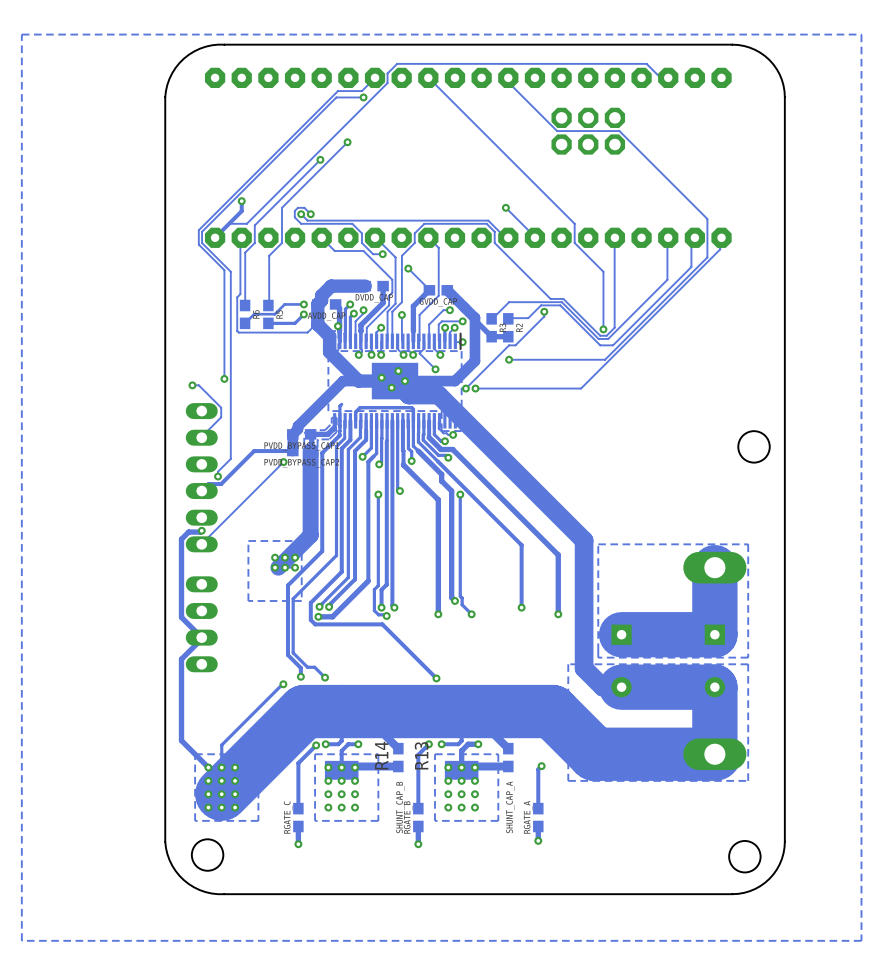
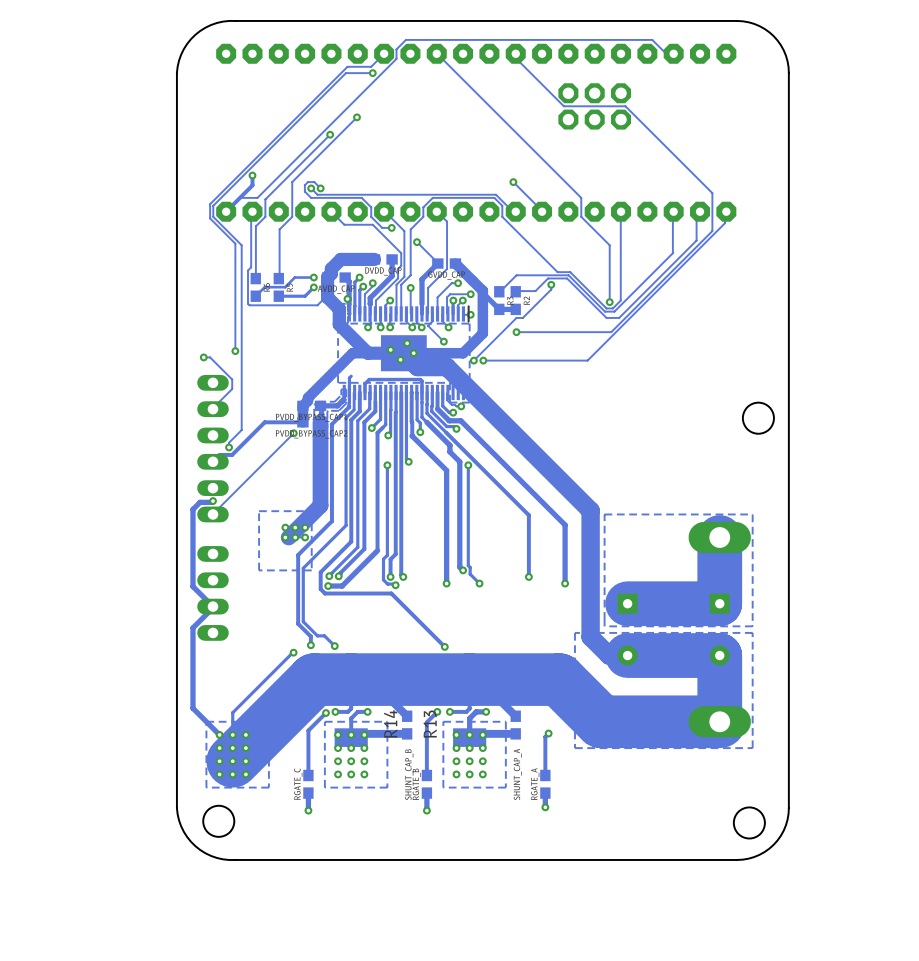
zone outline: (861, 34) (861, 940) (21, 940) (21, 34) (861, 34) -> none

